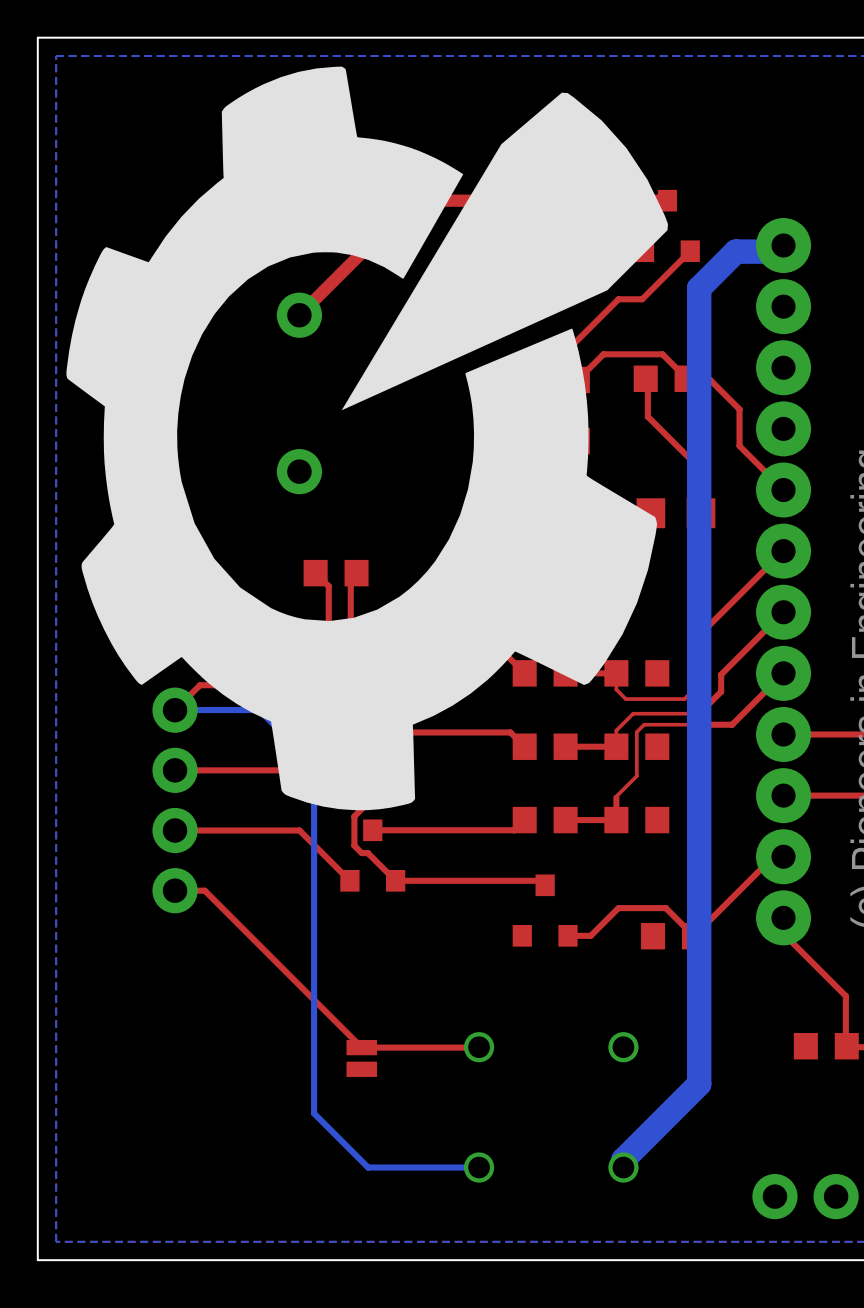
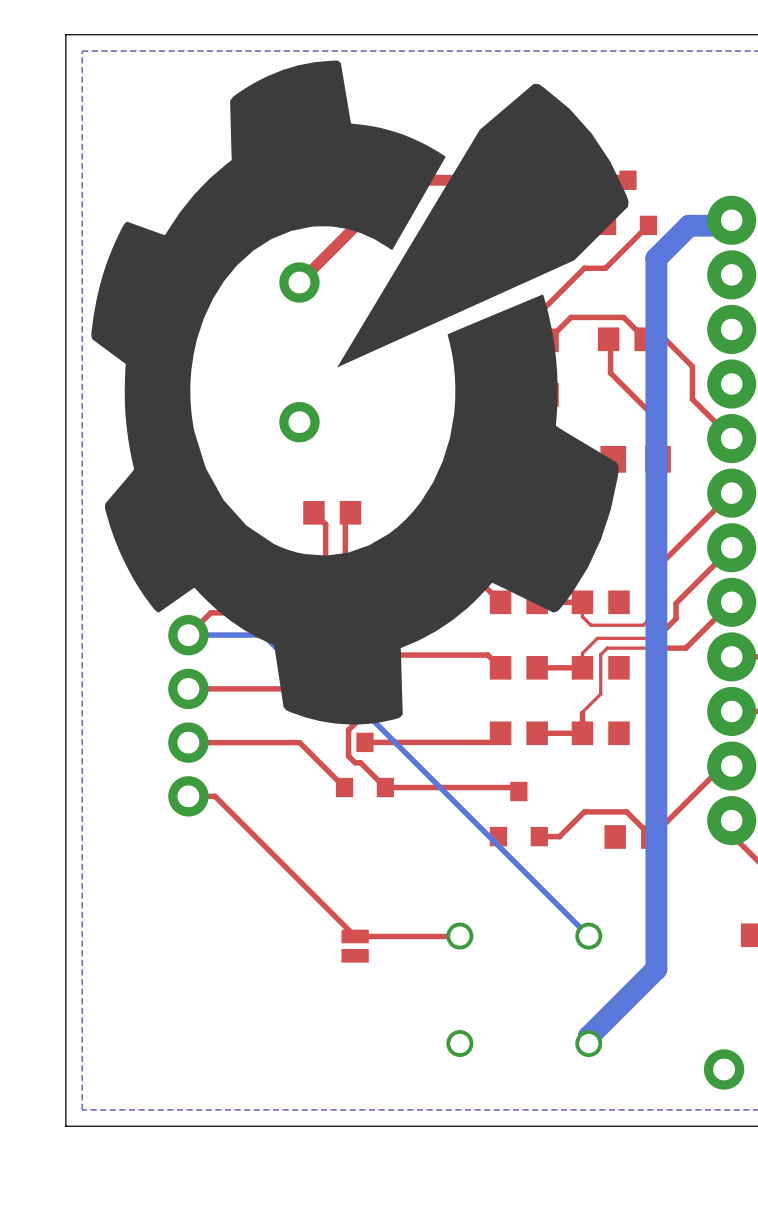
bottom track: (314, 765) (314, 1113) (368, 1167) (479, 1167) -> (312, 684) (336, 684) (588, 936)

